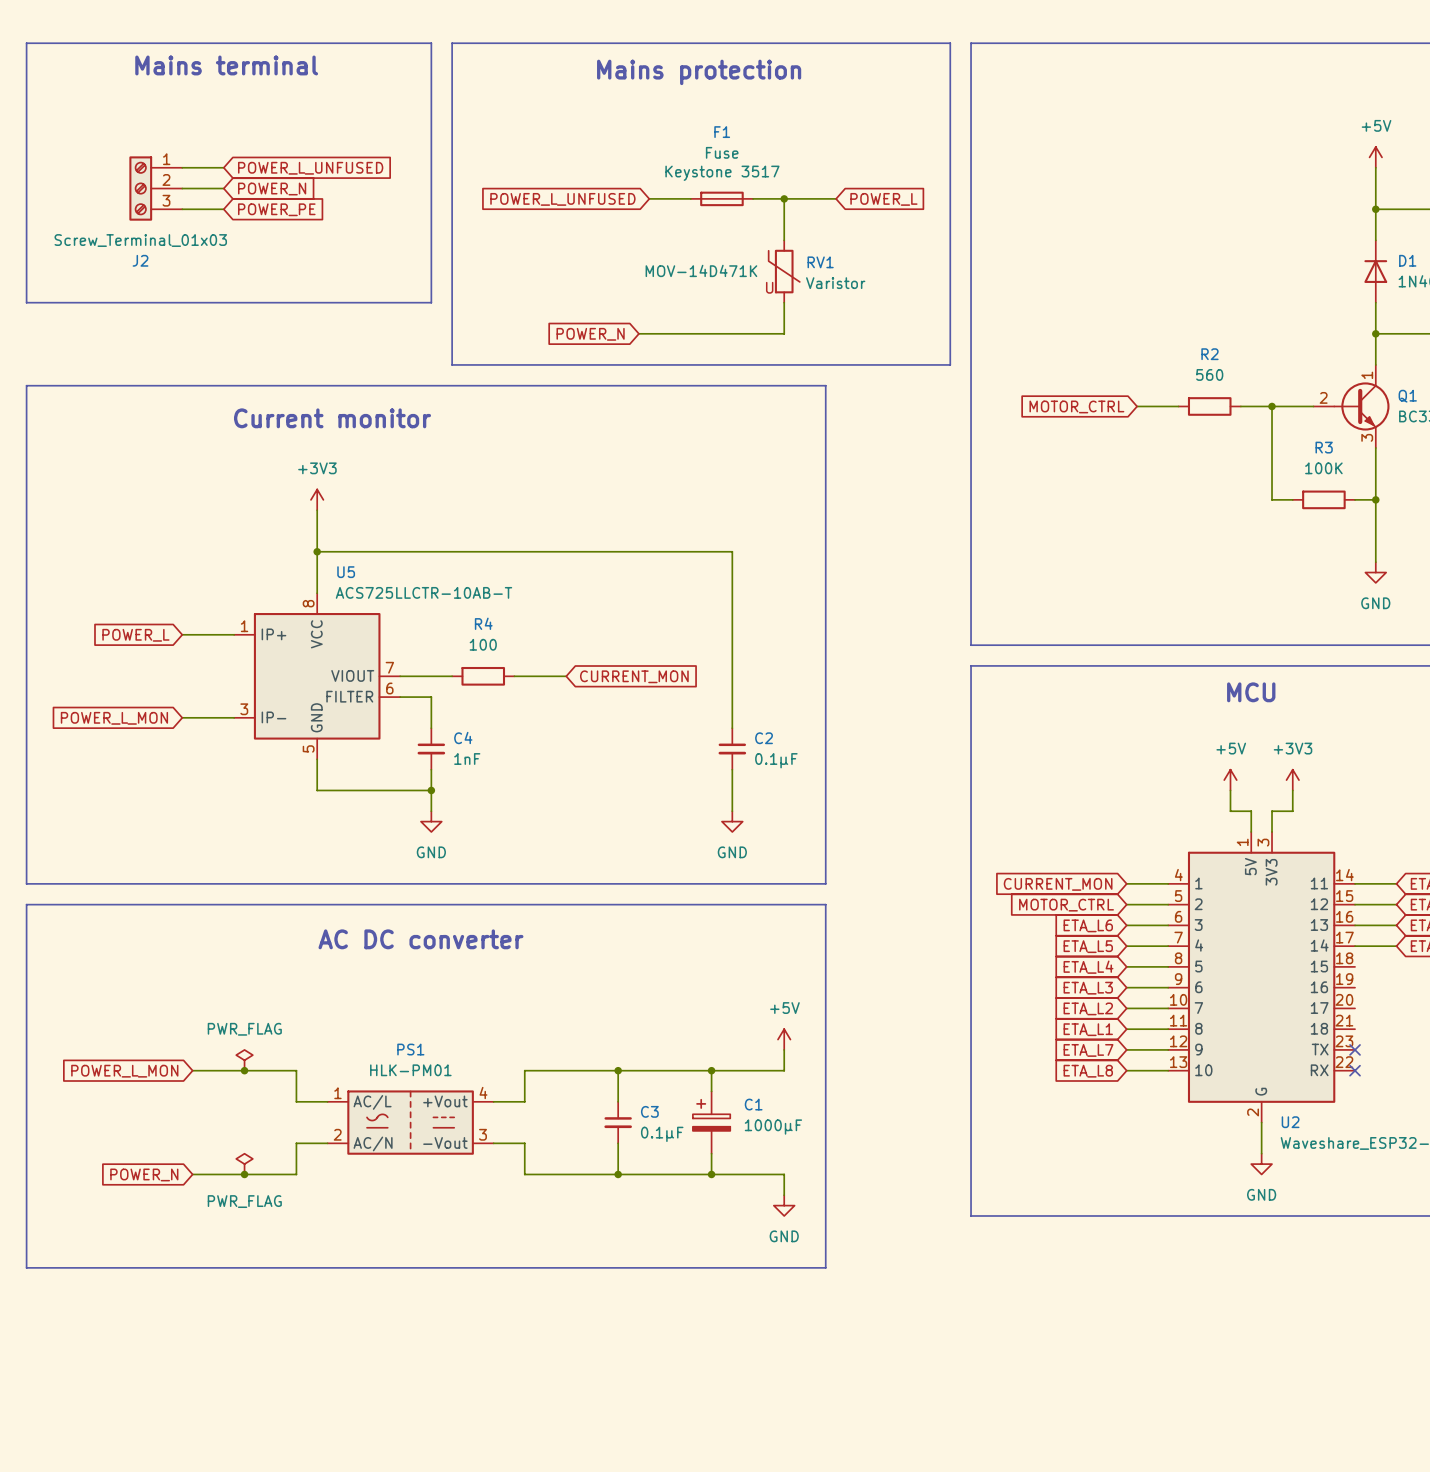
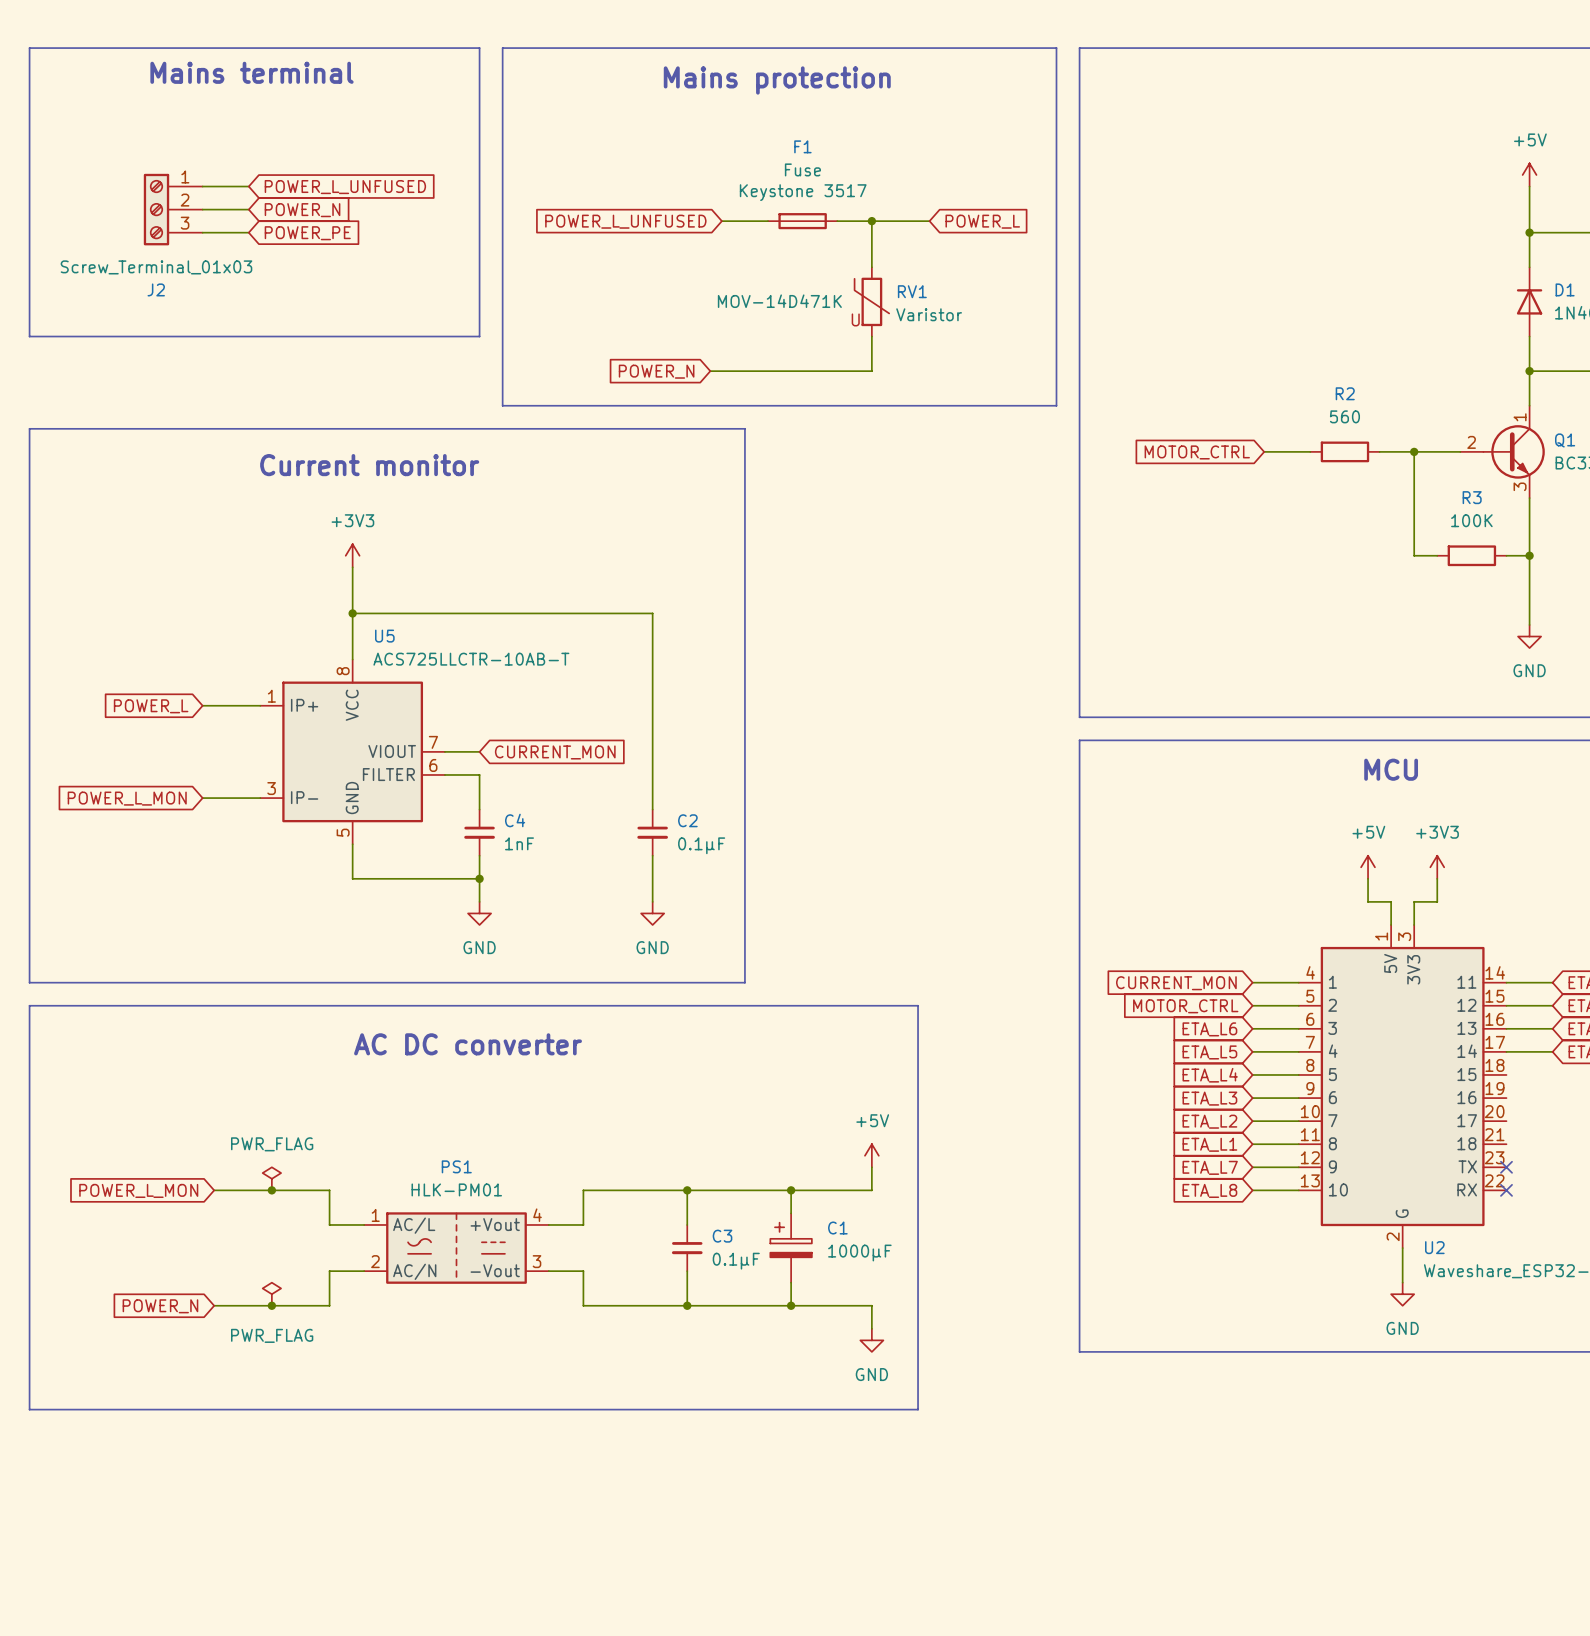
line: (670, 385) (825, 385) (825, 883) (670, 883) -> (744, 428) (744, 982)
wire: (587, 551) (732, 551) (732, 728) -> (652, 613) (652, 809)
wire: (431, 676) (452, 676) -> none
R4: 100 (483, 676) -> none
wire: (514, 676) (566, 676) -> none
global label position: CURRENT_MON (634, 676) -> CURRENT_MON (555, 752)
C2 position: (732, 748) -> (652, 832)
wire: (732, 769) (732, 811) -> (652, 855) (652, 901)
power symbol position: GND (732, 821) -> GND (652, 913)

